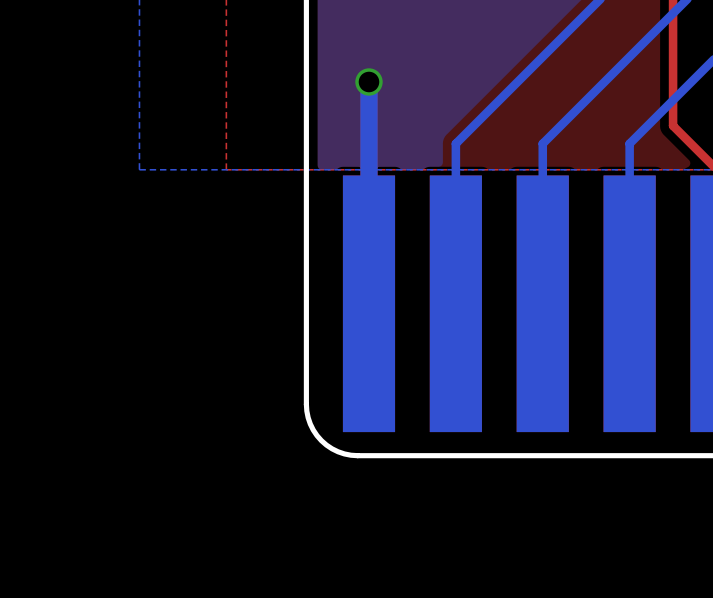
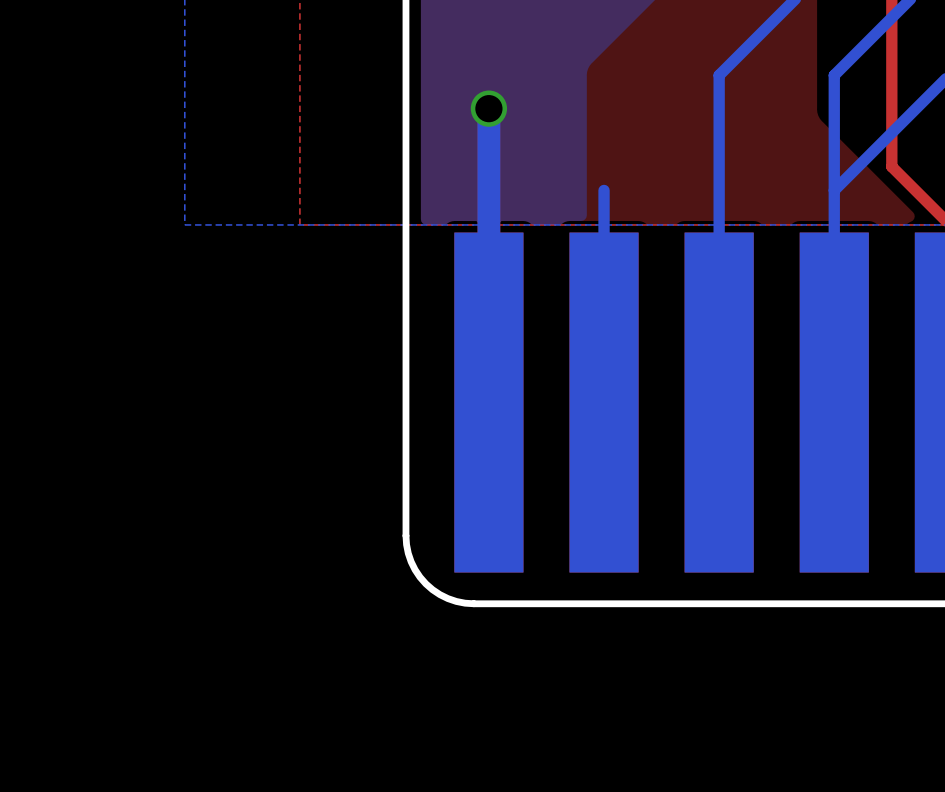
bottom track: (542, 56) (455, 143) -> (719, 75) (719, 190)
bottom track: (629, 56) (542, 143) -> (834, 75) (834, 190)

